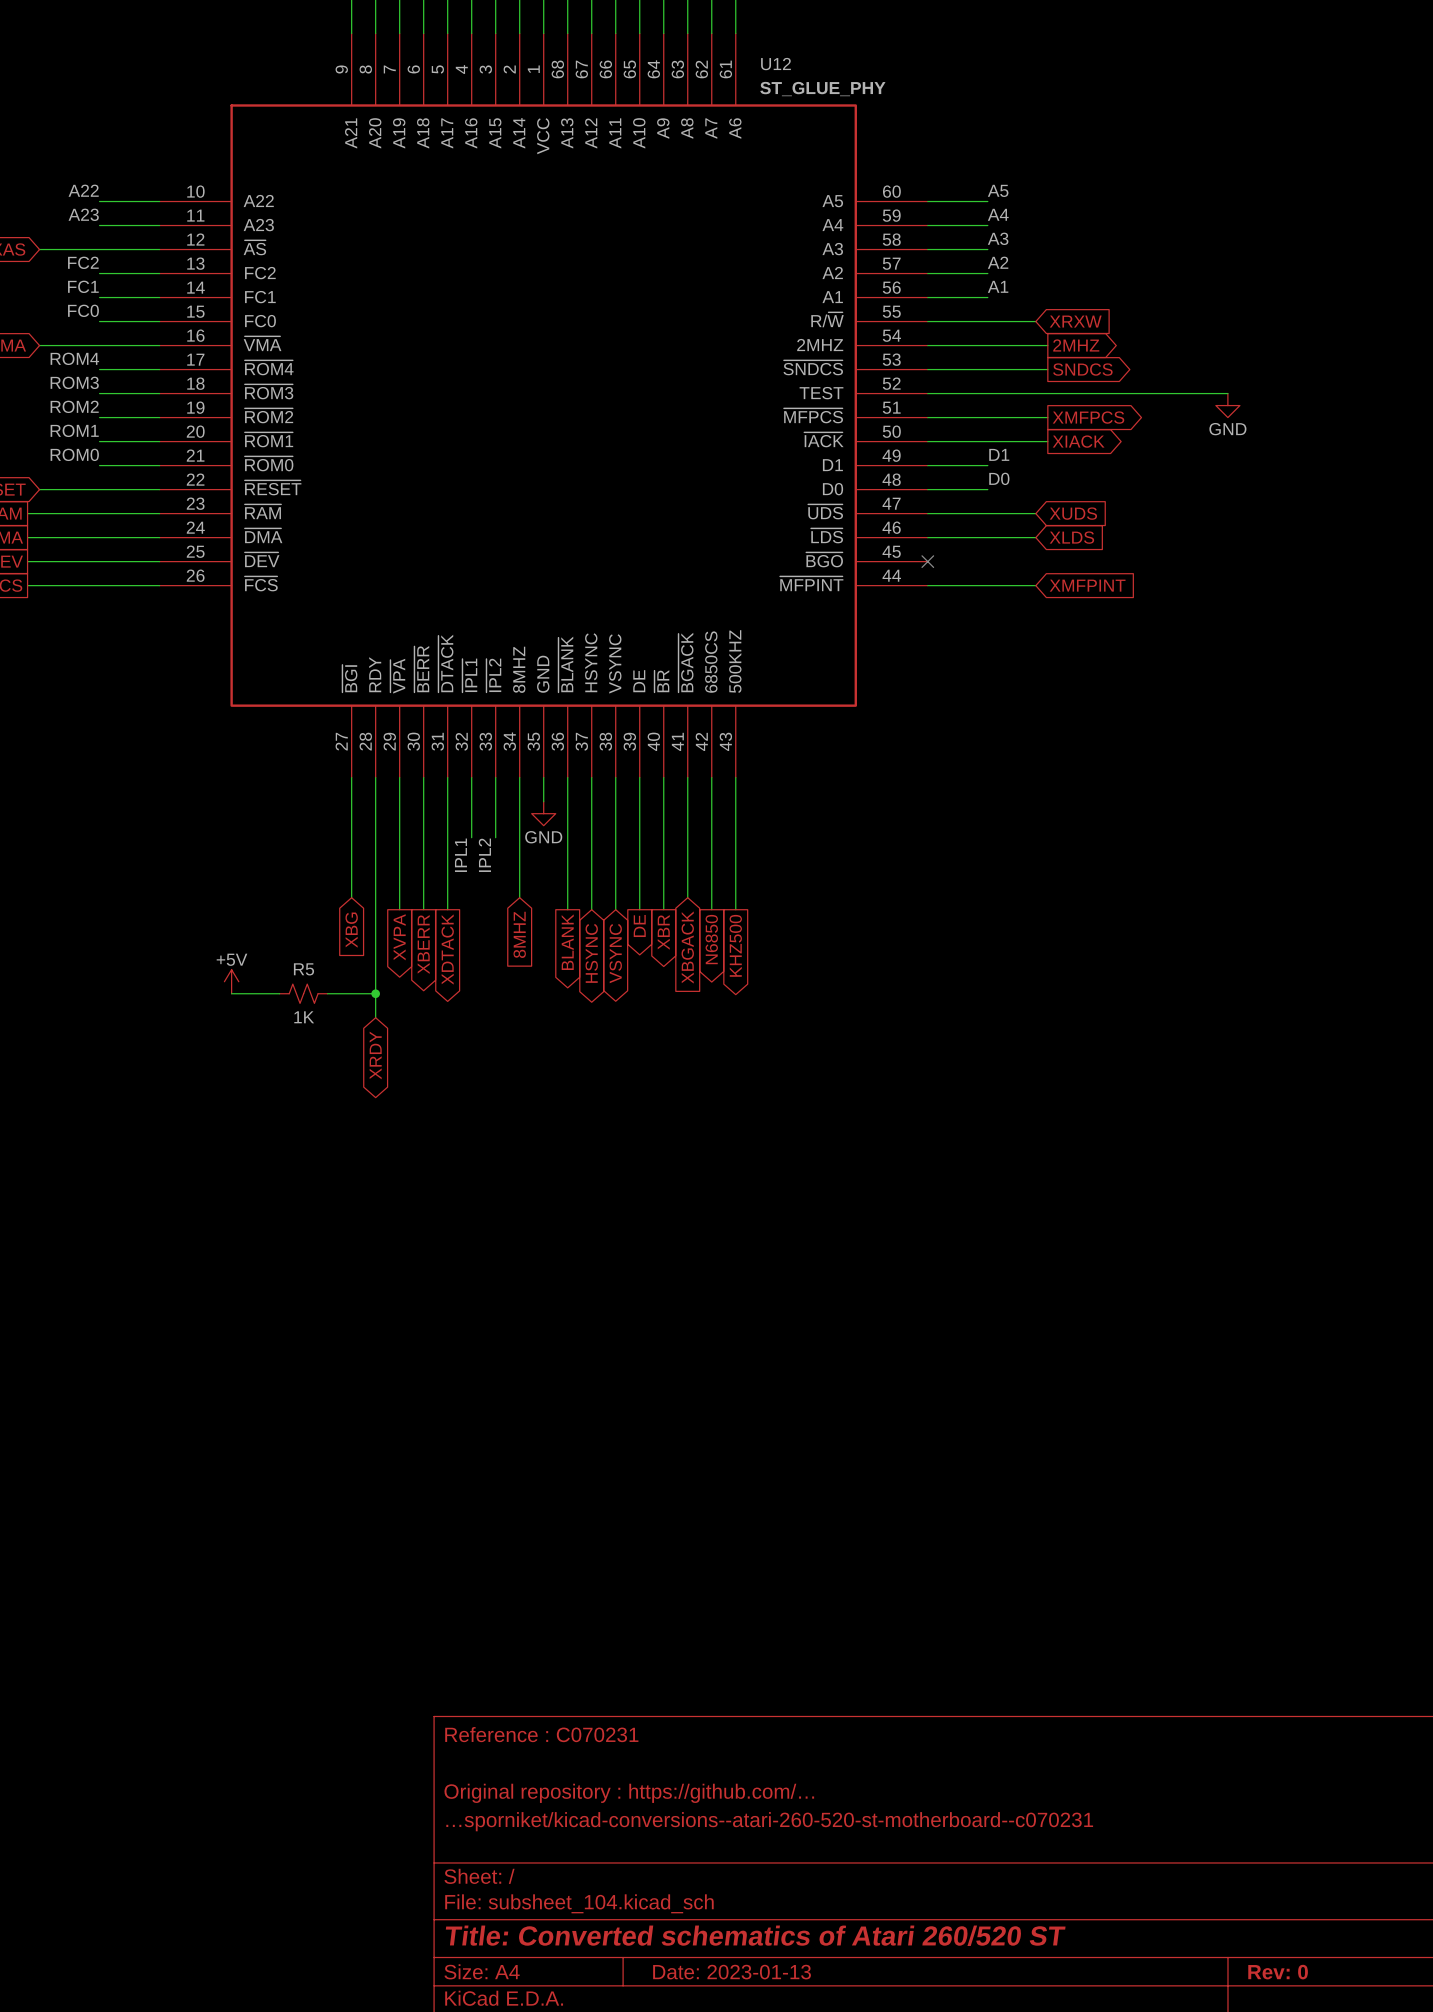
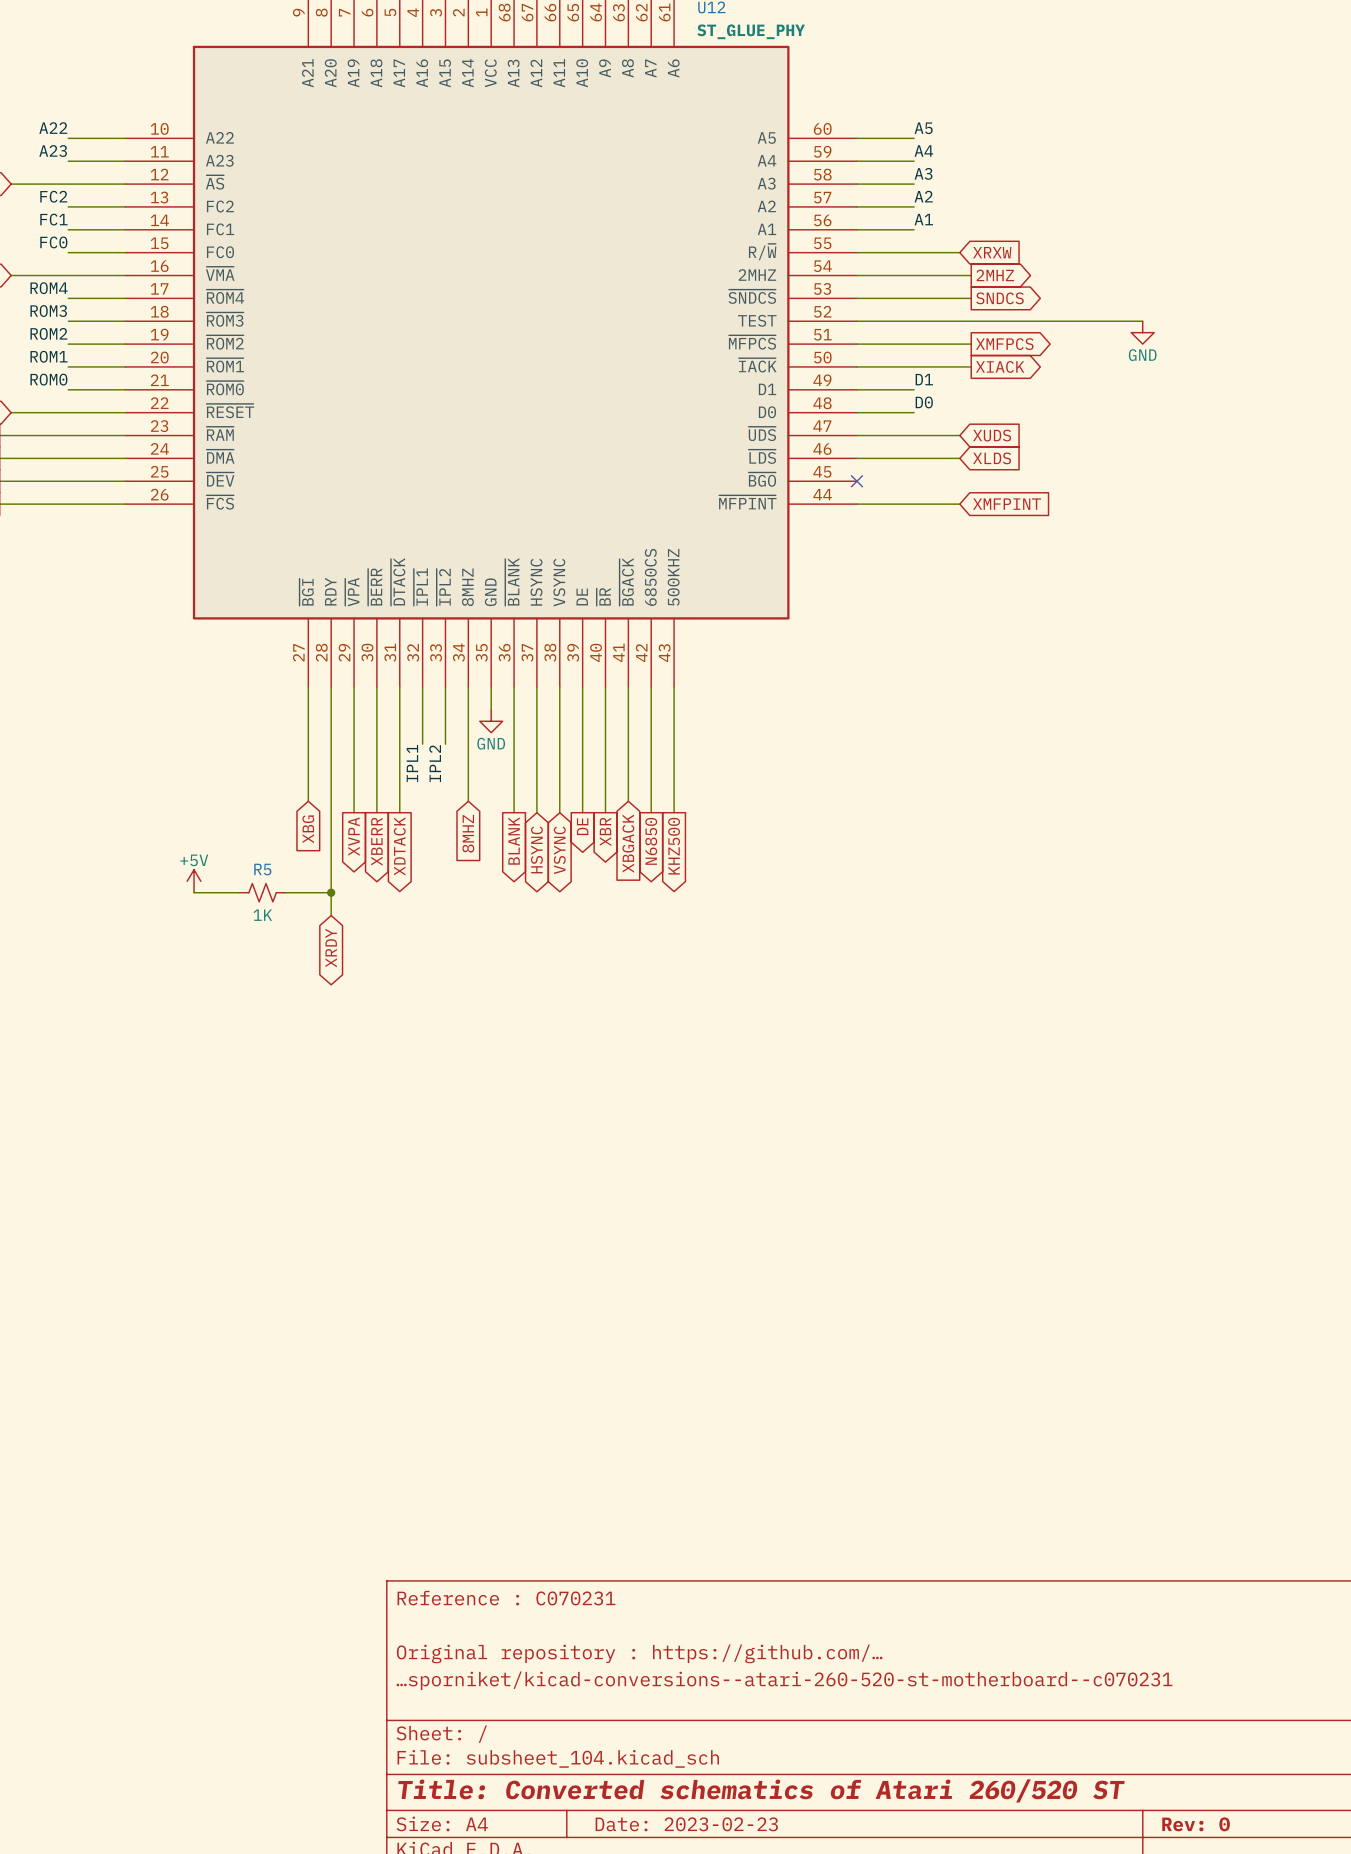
title block: Date: 2023-01-13 (732, 1972) -> Date: 2023-02-23 (686, 1824)

